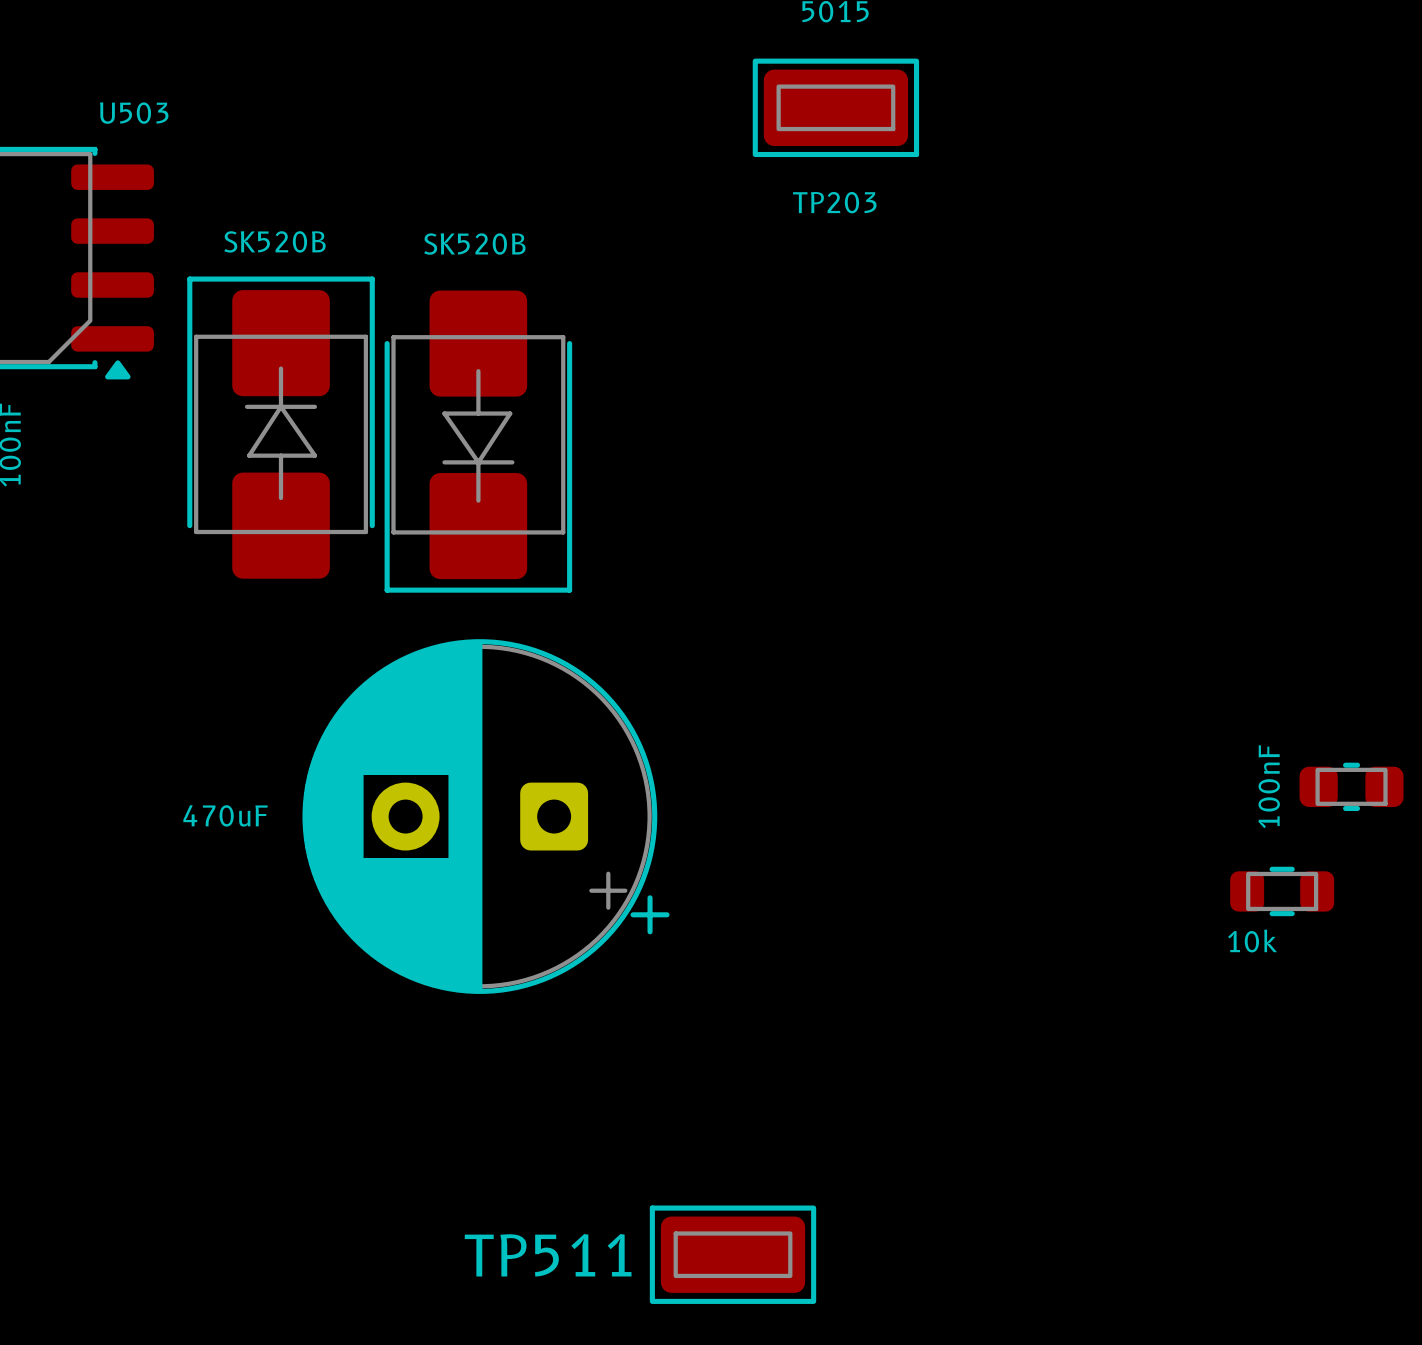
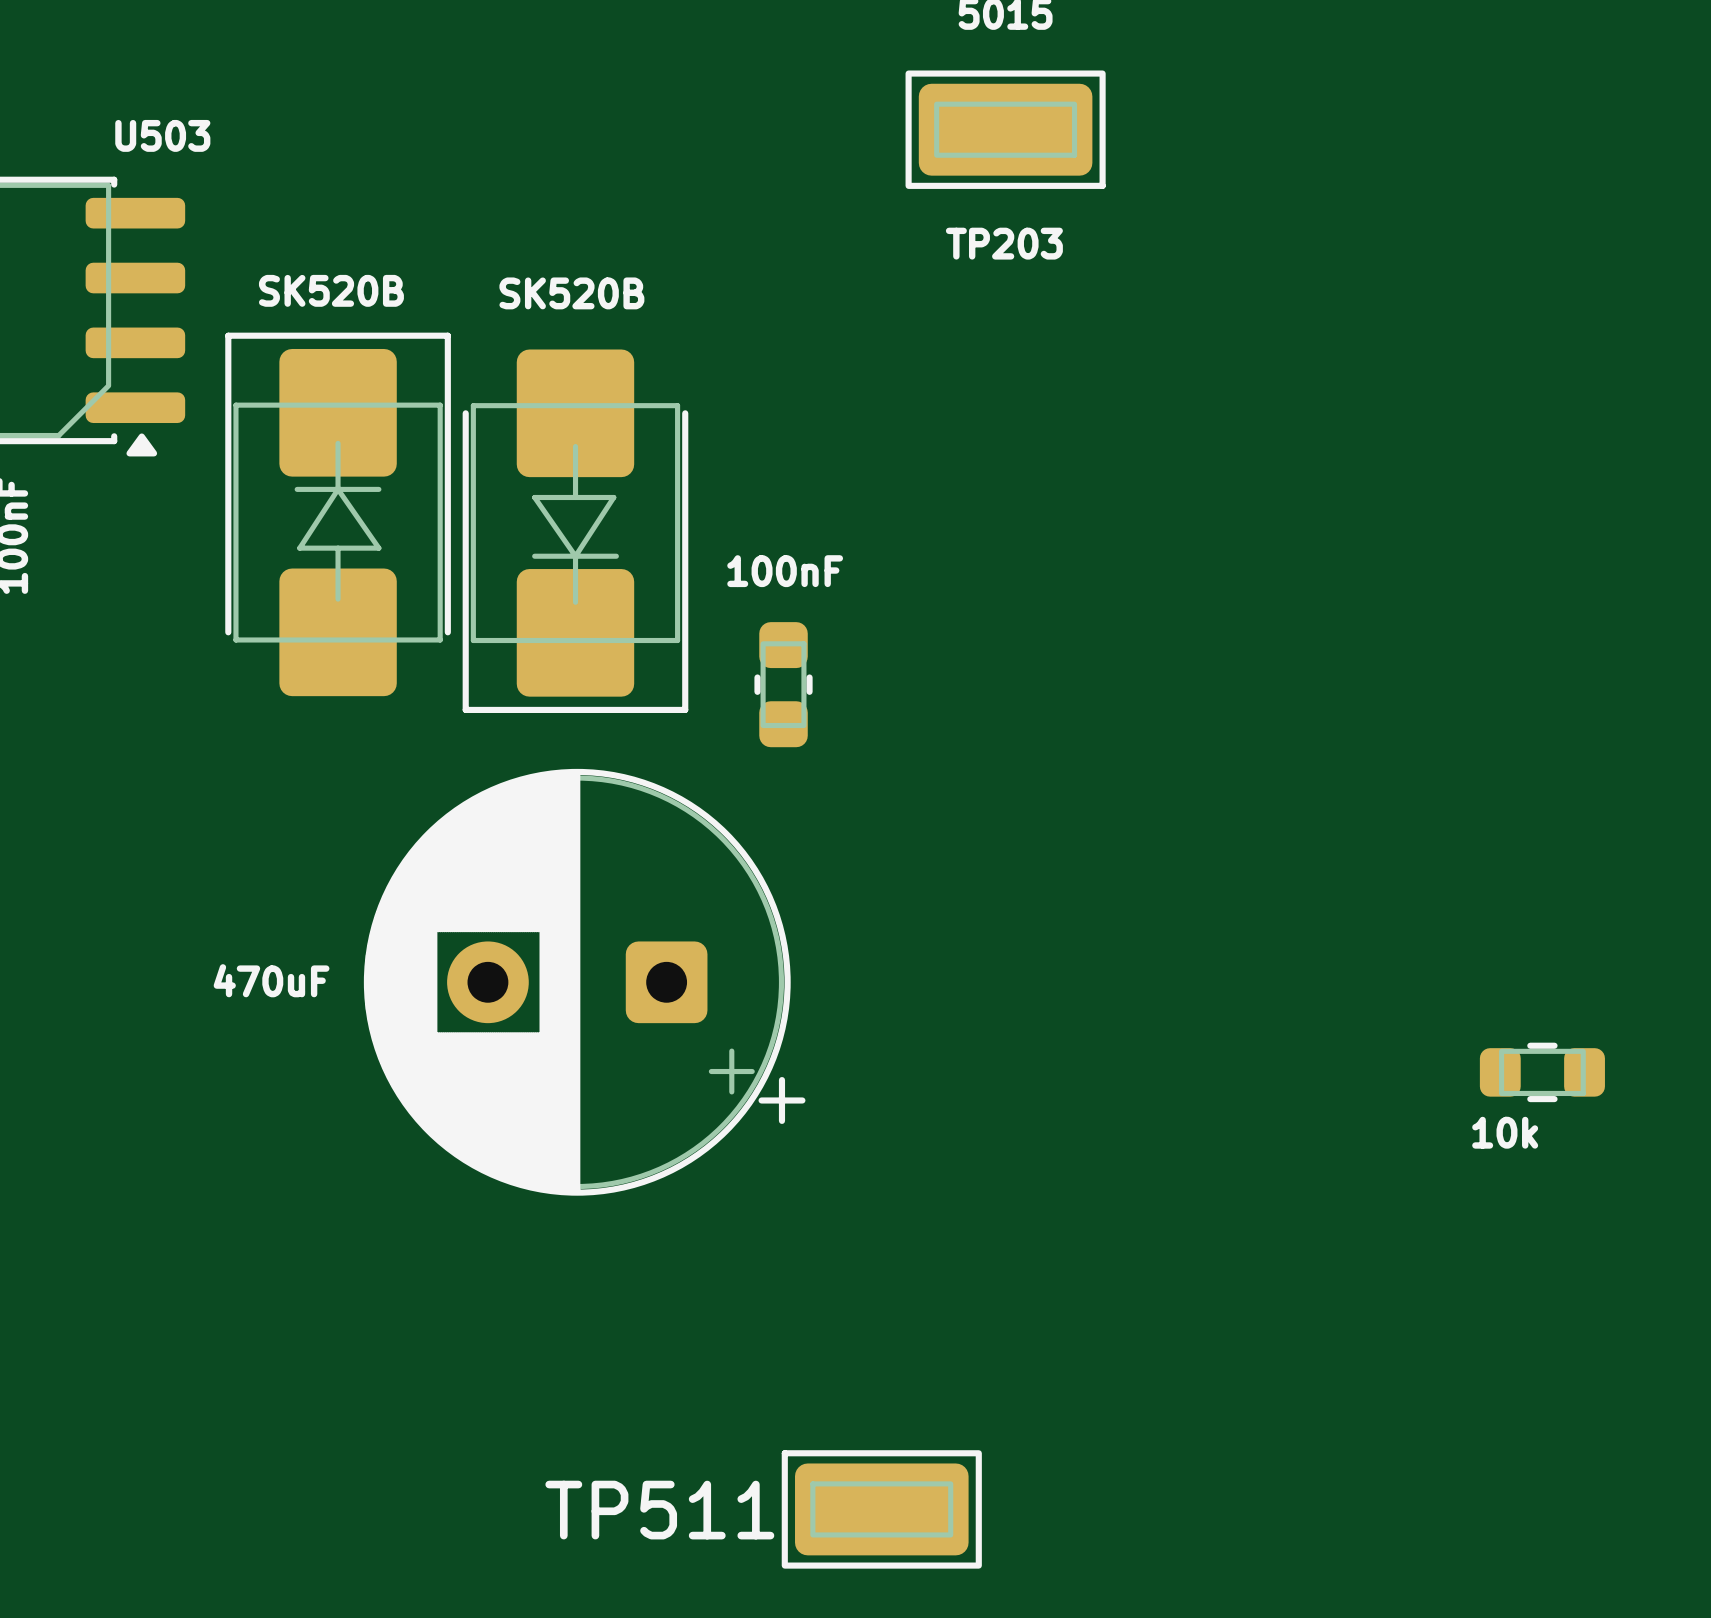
part rotation: 0° (1351, 786) -> 90° clockwise (783, 684)
part position: (1351, 786) -> (783, 684)

